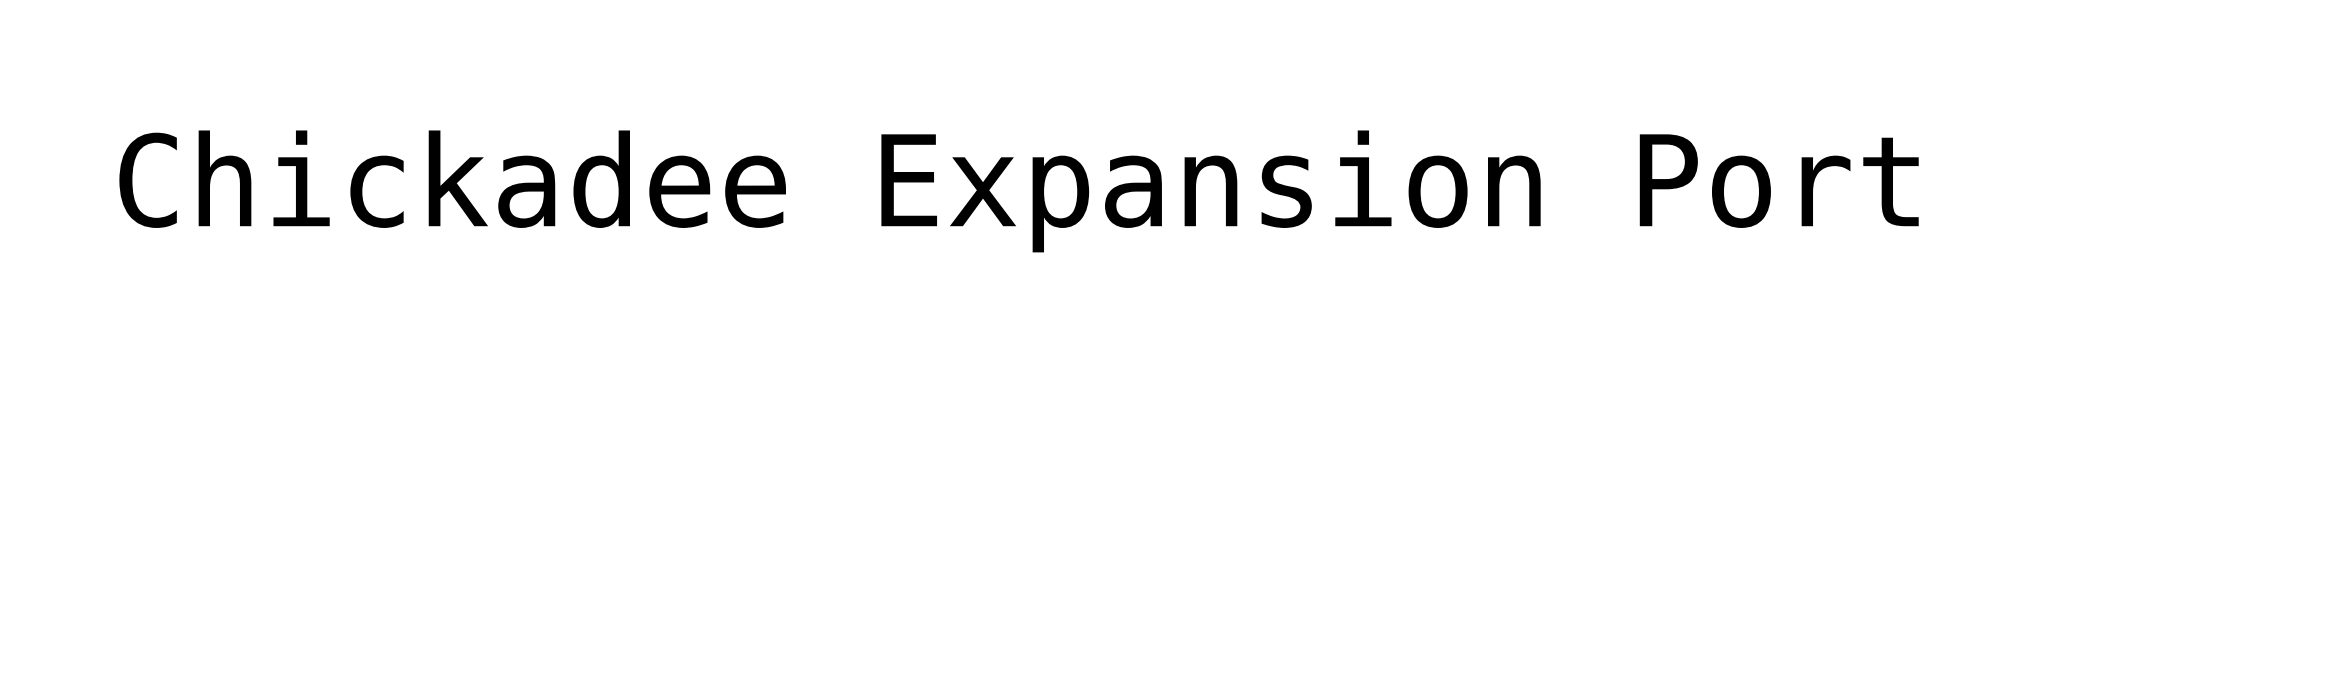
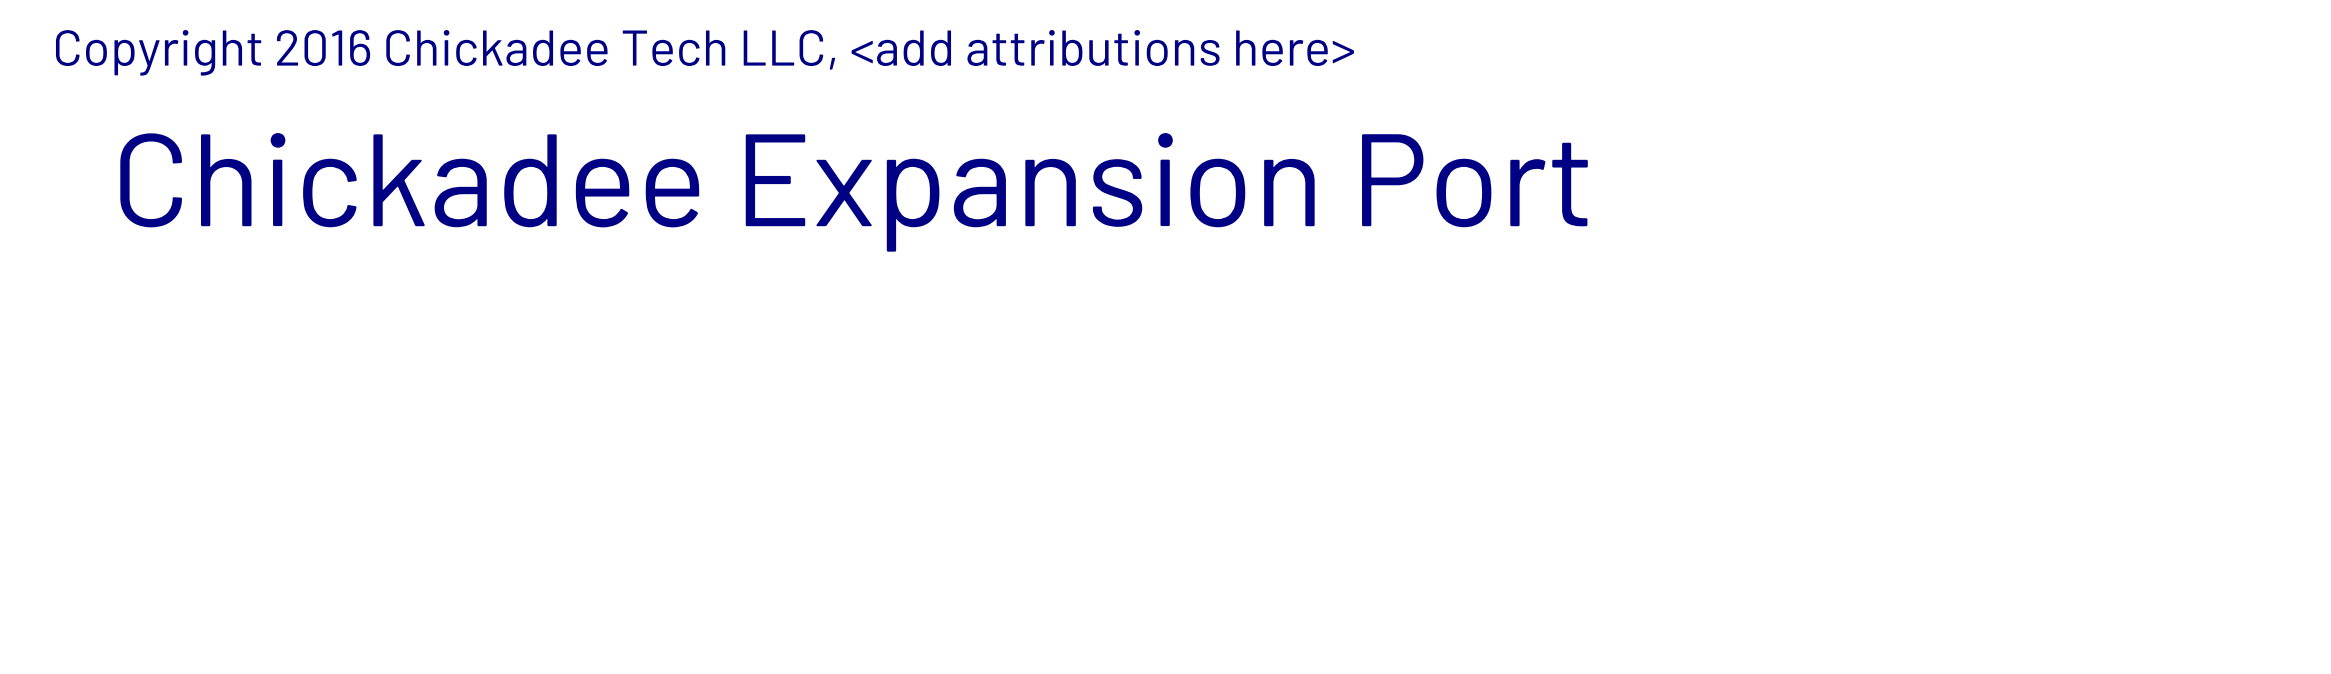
text: none -> Copyright 2016 Chickadee Tech LLC, <add attributions here> (704, 52)

